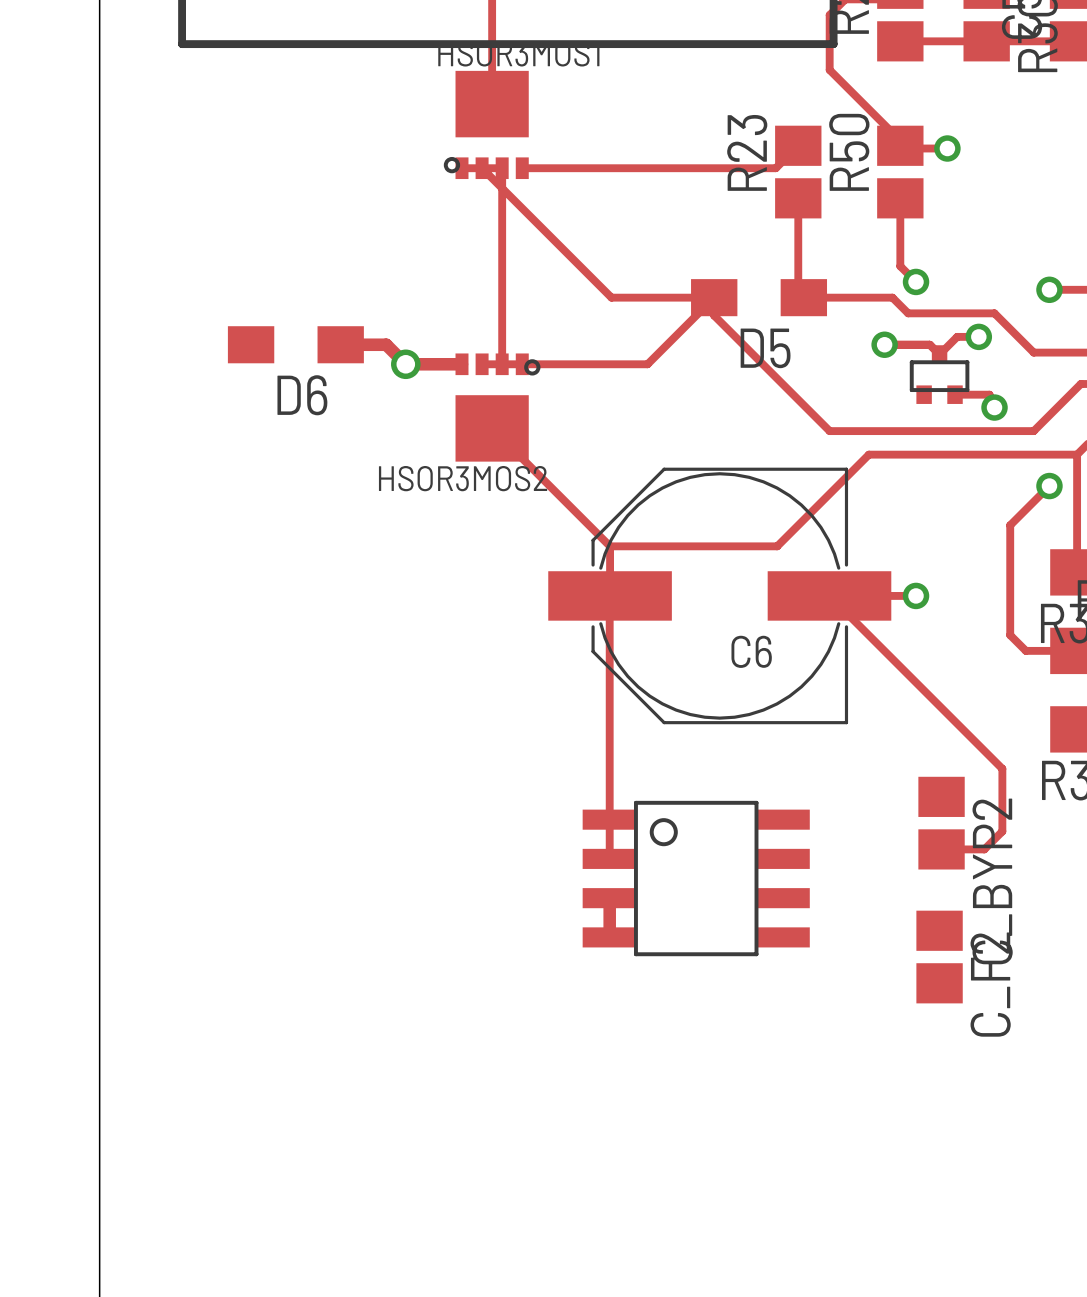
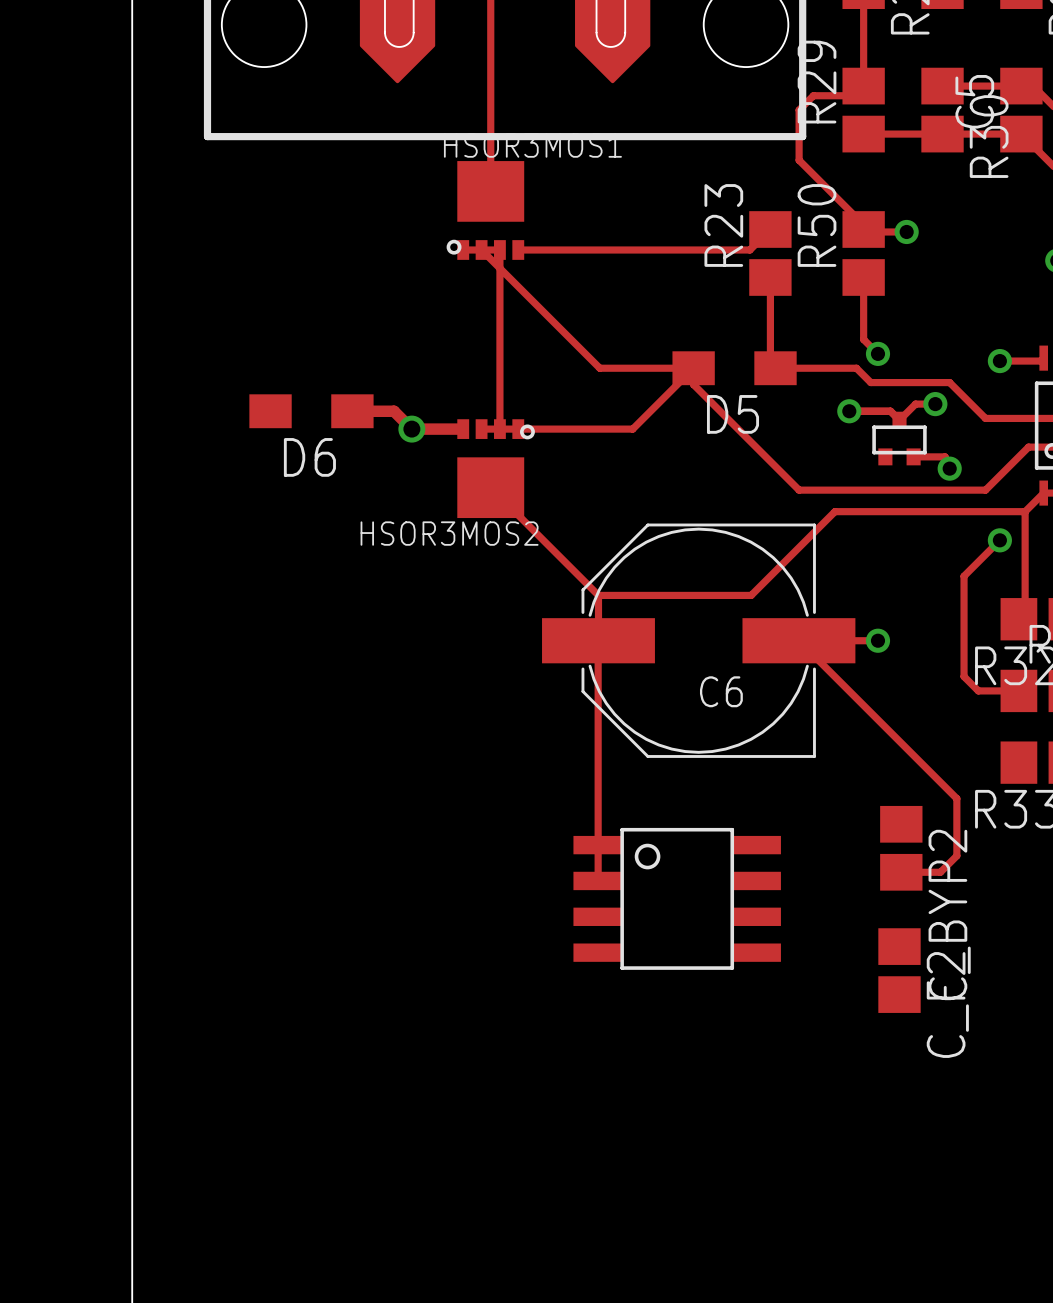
track: (609, 898) (609, 937) -> none

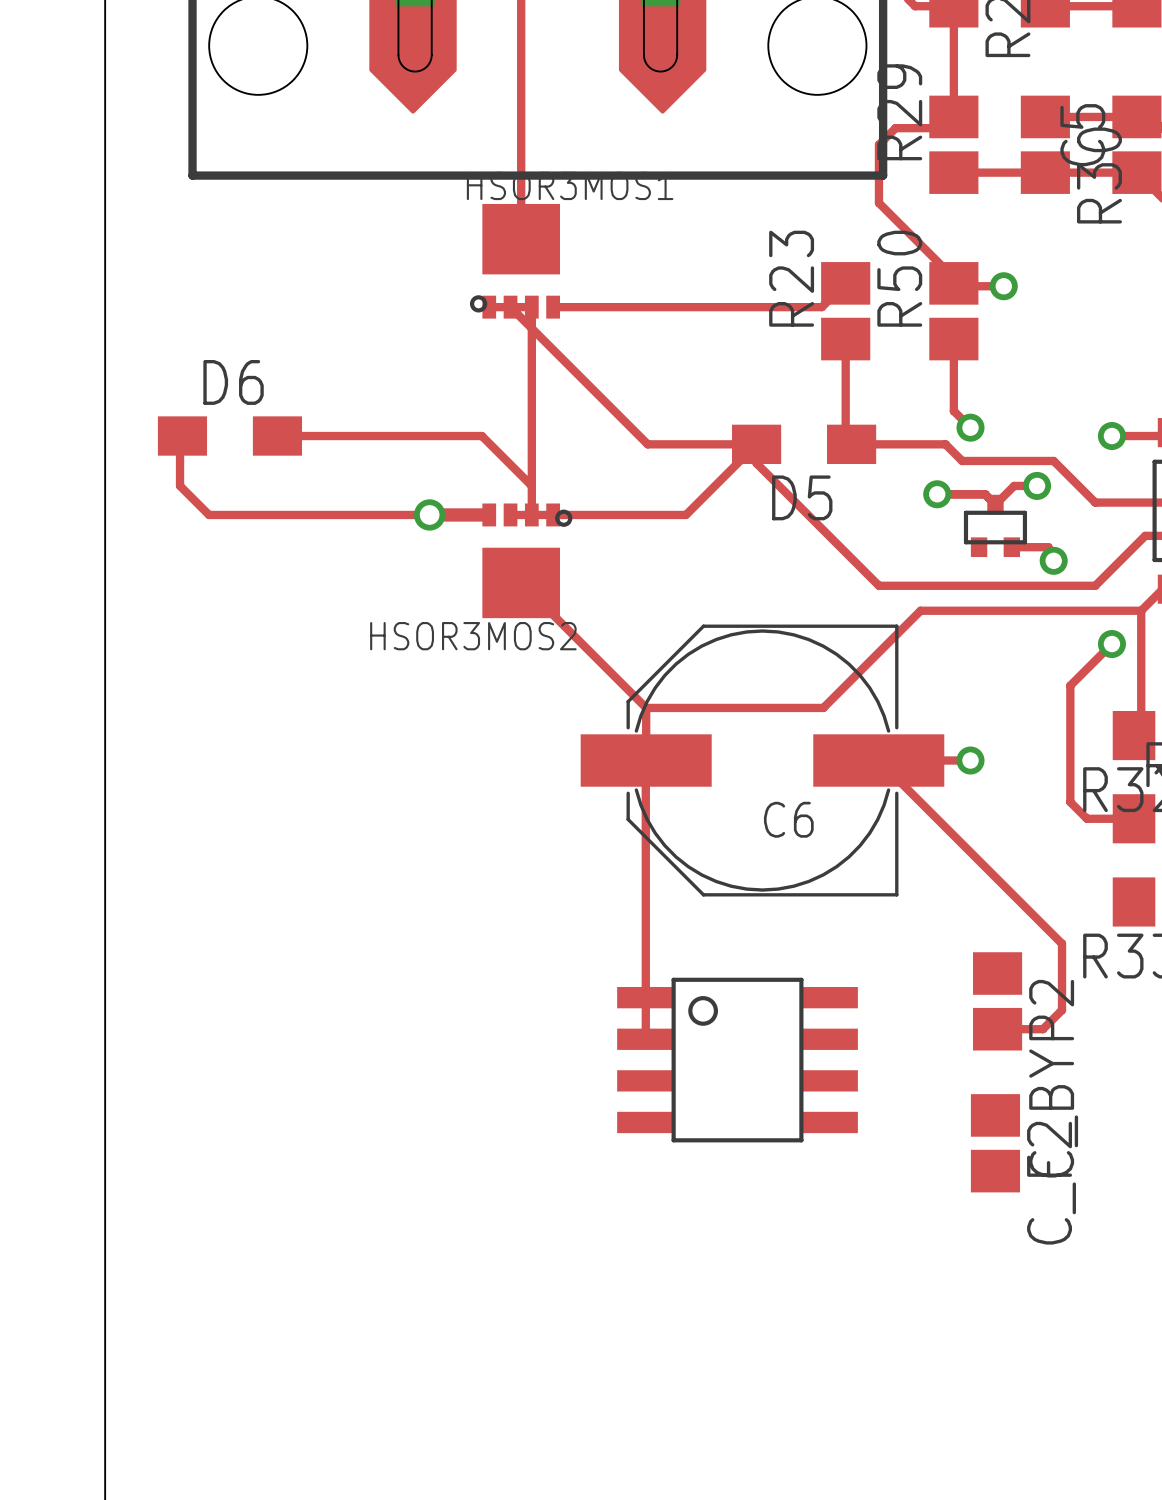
track: none -> (277, 436) (481, 436) (531, 485)
D6 position: (311, 411) -> (229, 436)
track: (352, 411) (394, 411) (411, 429) -> (182, 436) (180, 438) (180, 485) (209, 514) (429, 514)
D6 name position: D6 (309, 457) -> D6 (233, 382)

